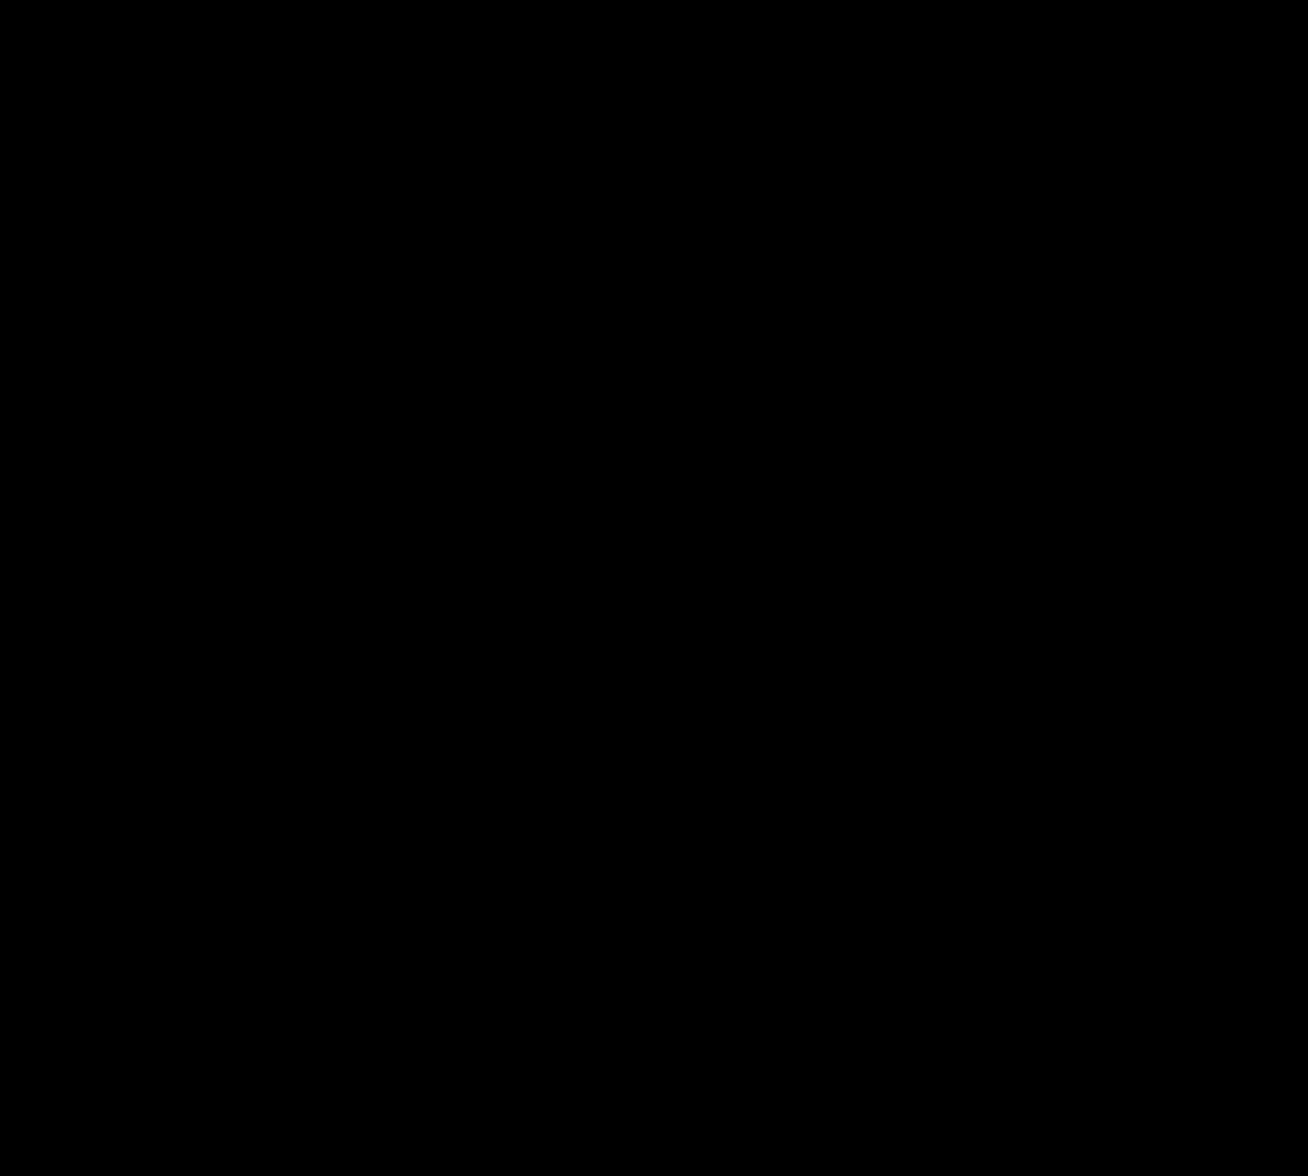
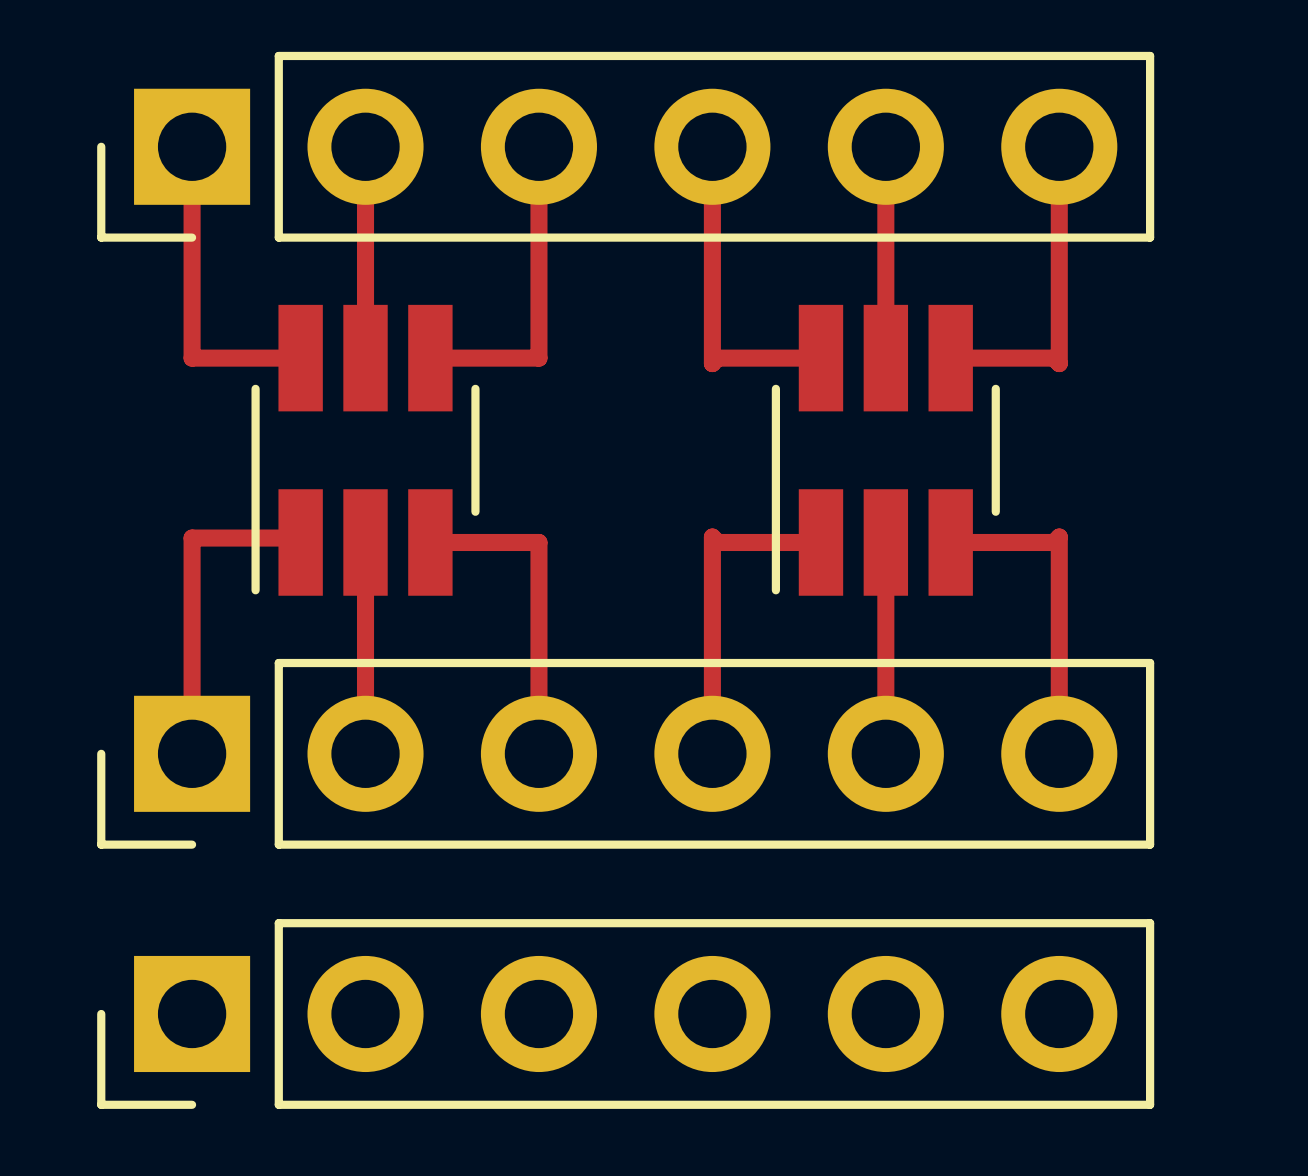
top track: none -> (192, 146) (192, 358) (300, 358)
top track: none -> (365, 146) (365, 358)
top track: none -> (538, 146) (538, 358) (430, 358)
part: none -> (625, 146)
top track: none -> (712, 146) (712, 363) (717, 358) (820, 358)
top track: none -> (885, 146) (885, 358)
top track: none -> (1059, 146) (1059, 363) (1053, 358) (950, 358)
part: none -> (365, 450)
part: none -> (885, 450)
top track: none -> (300, 542) (296, 538) (192, 538) (192, 753)
top track: none -> (365, 542) (365, 753)
top track: none -> (430, 542) (538, 542) (538, 753)
top track: none -> (820, 542) (717, 542) (712, 537) (712, 753)
top track: none -> (885, 542) (885, 753)
top track: none -> (950, 542) (1053, 542) (1059, 537) (1059, 753)
part: none -> (625, 753)
part: none -> (625, 1013)

